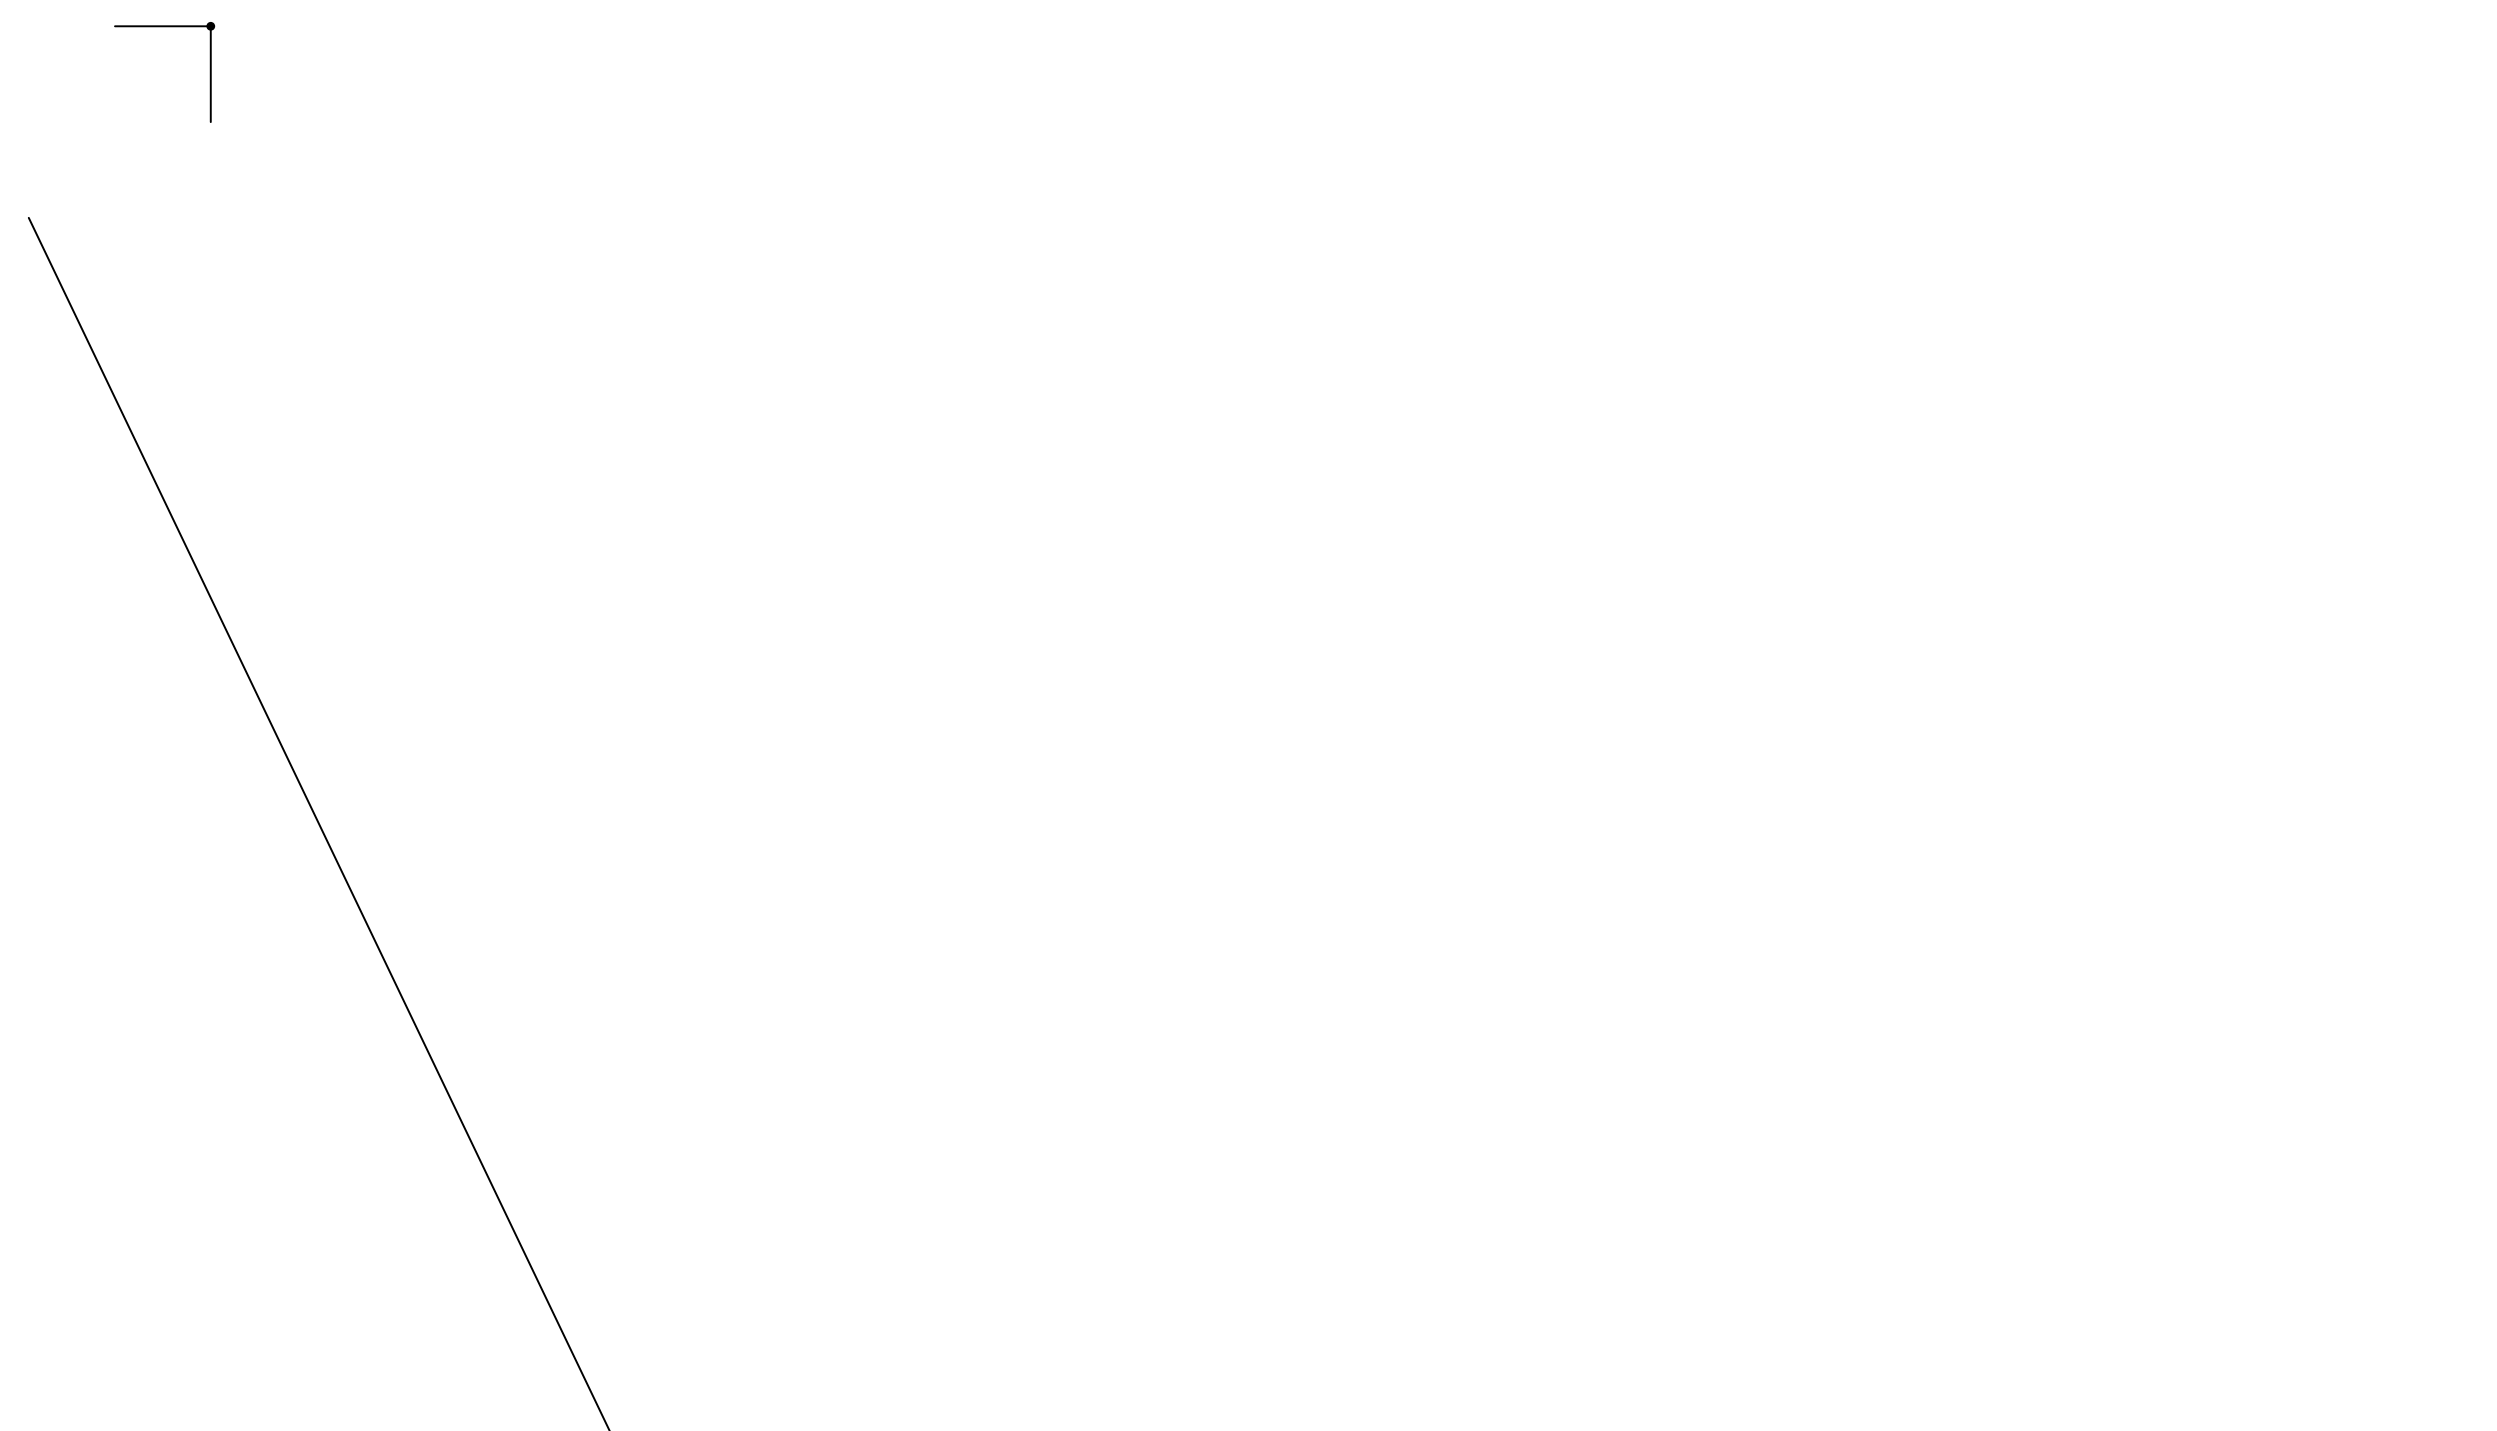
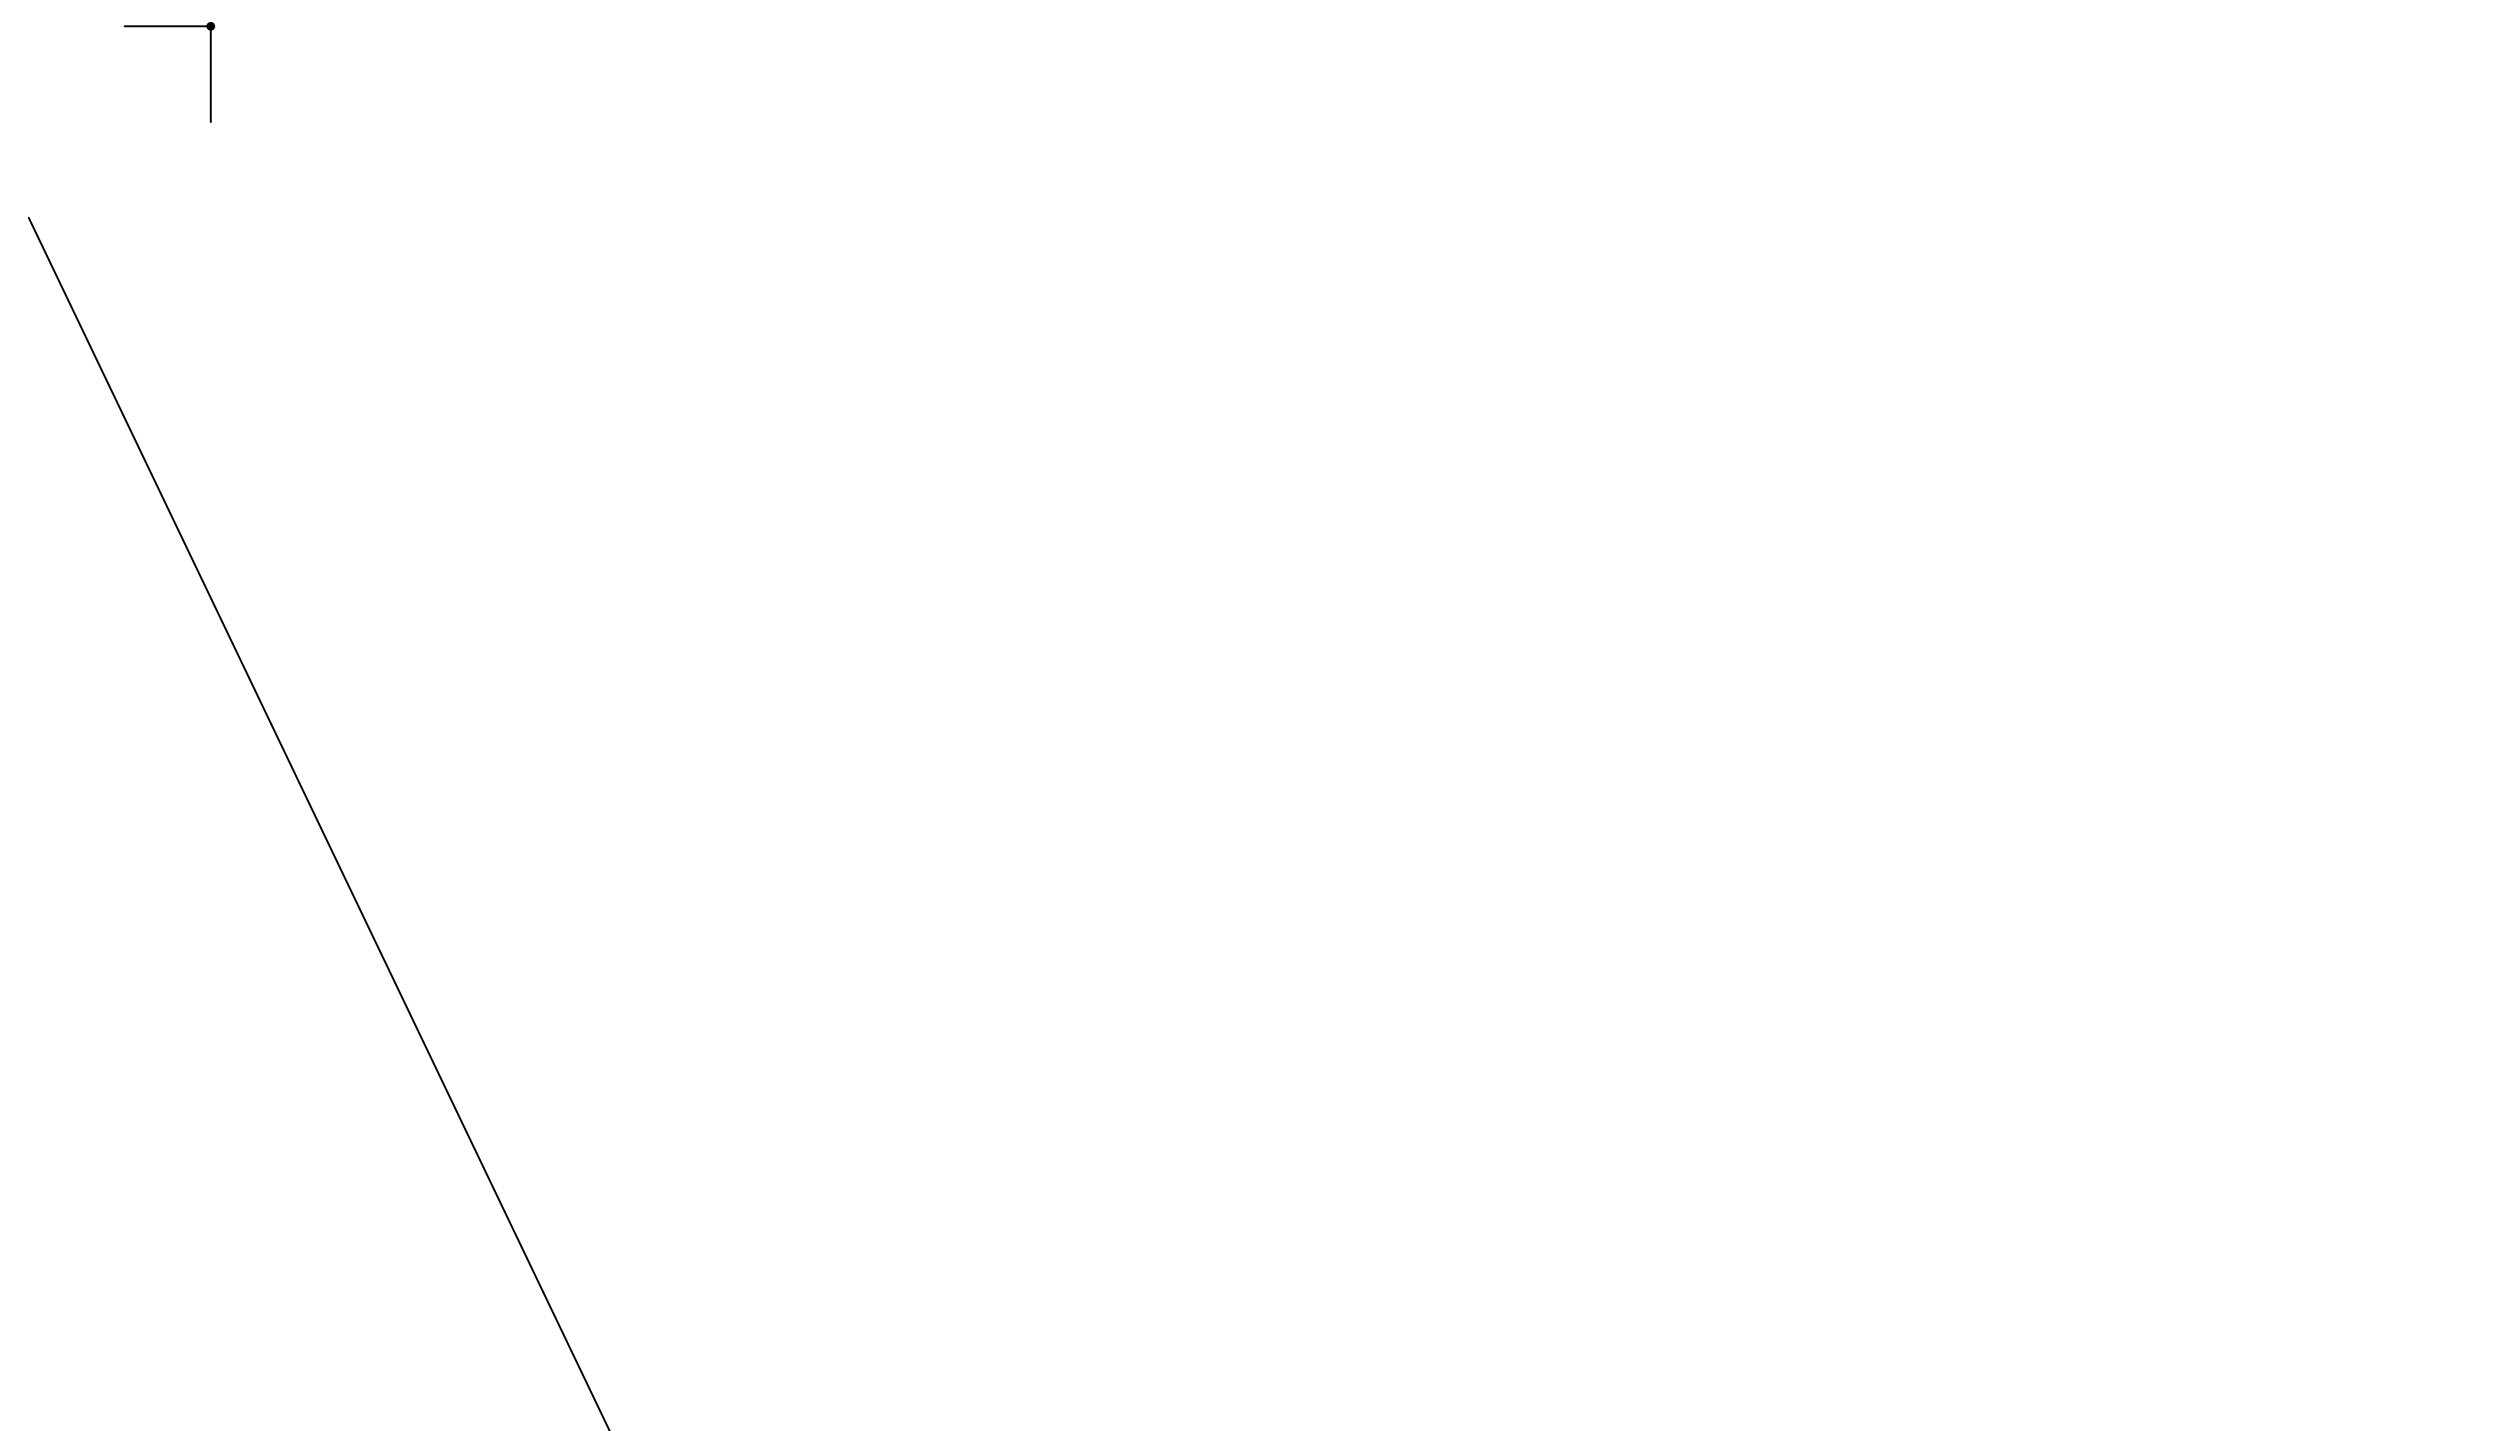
wire: (114, 26) (124, 26) -> none

